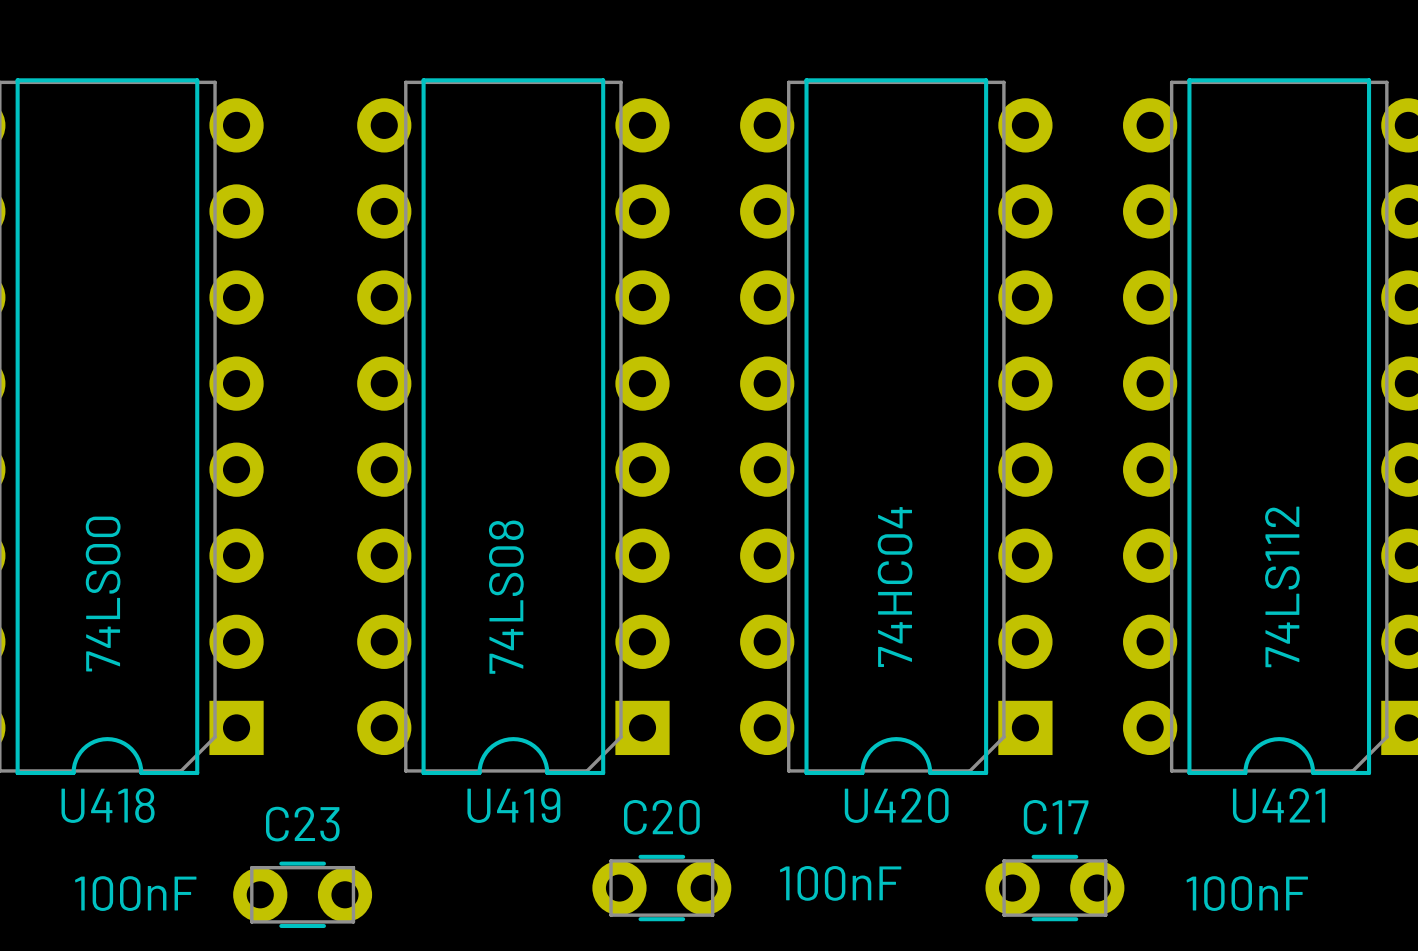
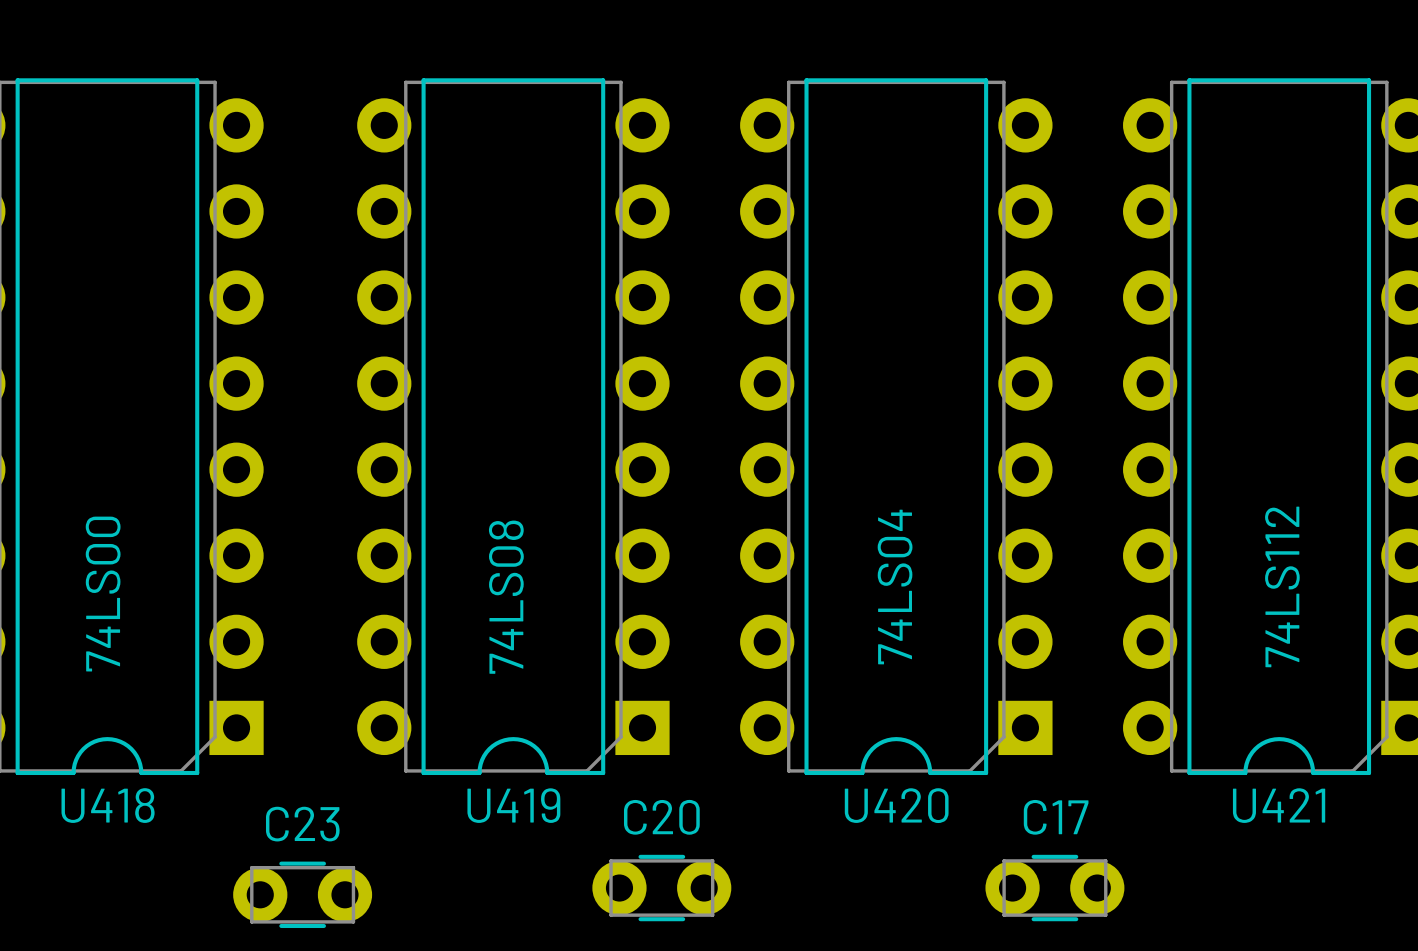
U420 value: 74HC04 (895, 587) -> 74LS04 (895, 587)
C20 value: 100nF (840, 883) -> none
C23 value: 100nF (135, 893) -> none
C17 value: 100nF (1247, 893) -> none

